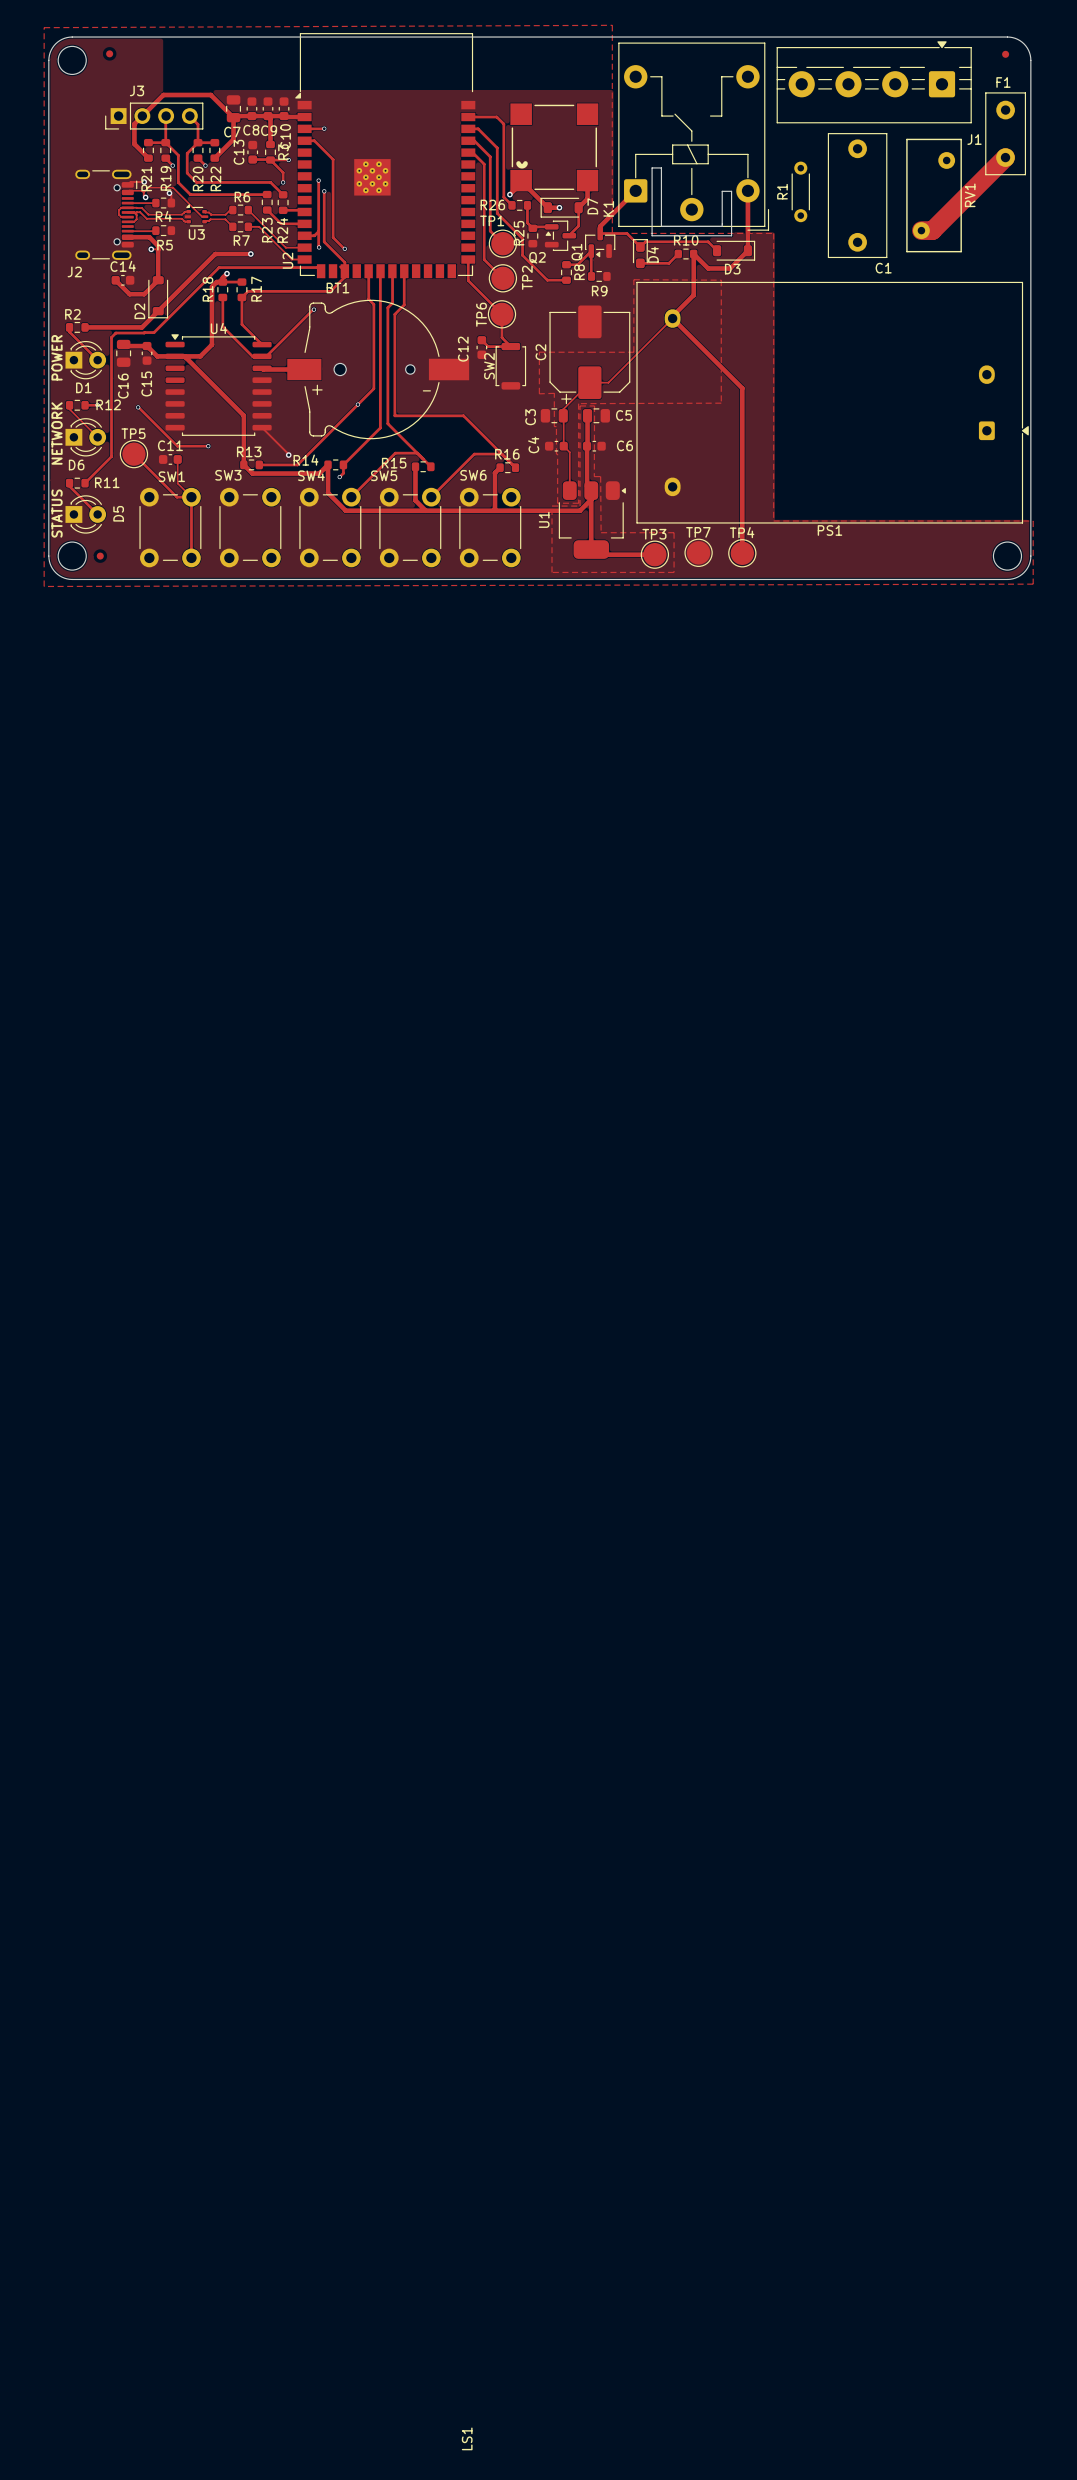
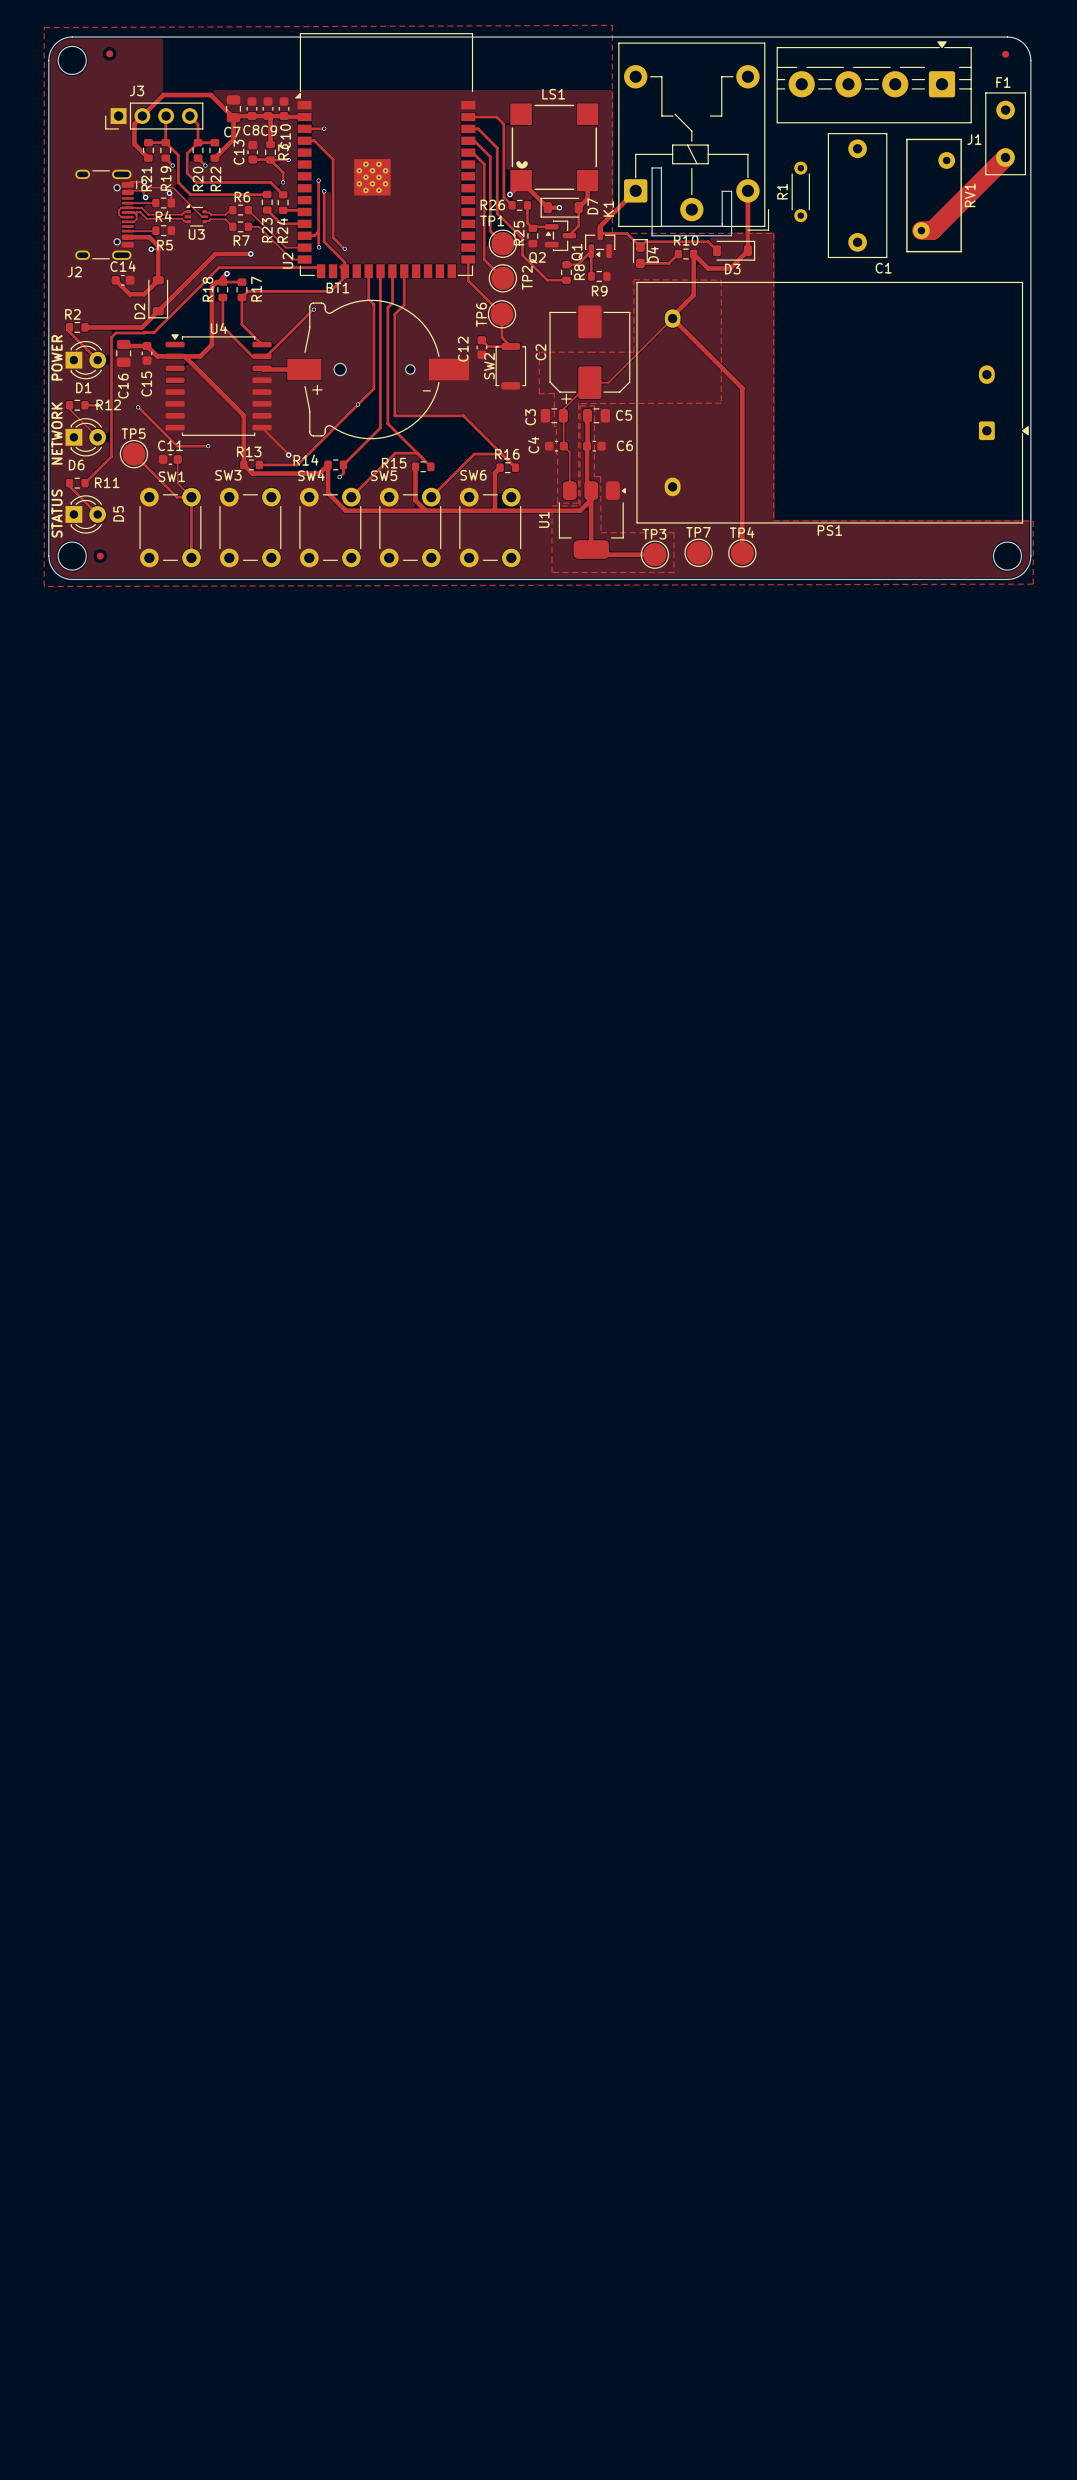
LS1 name rotation: 0° (467, 2438) -> 90° clockwise (553, 94)
LS1 name position: LS1 (467, 2438) -> LS1 (553, 94)

